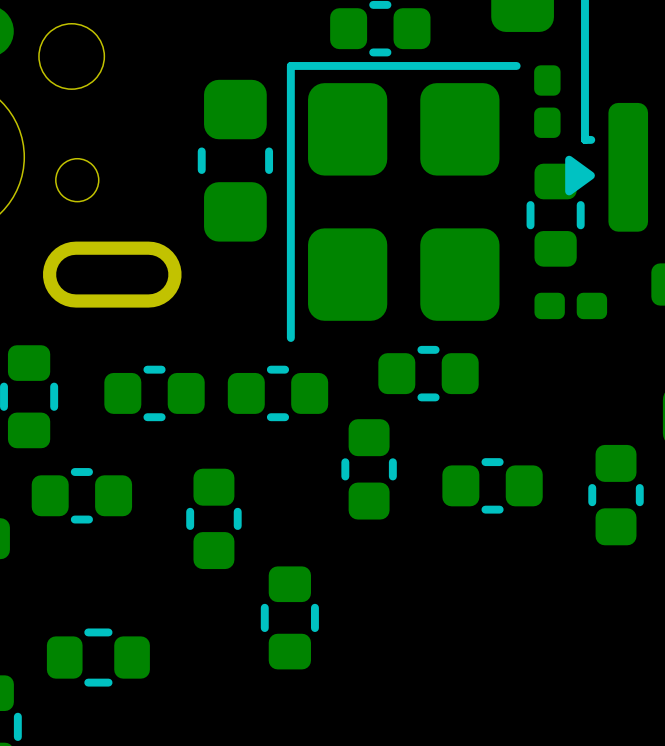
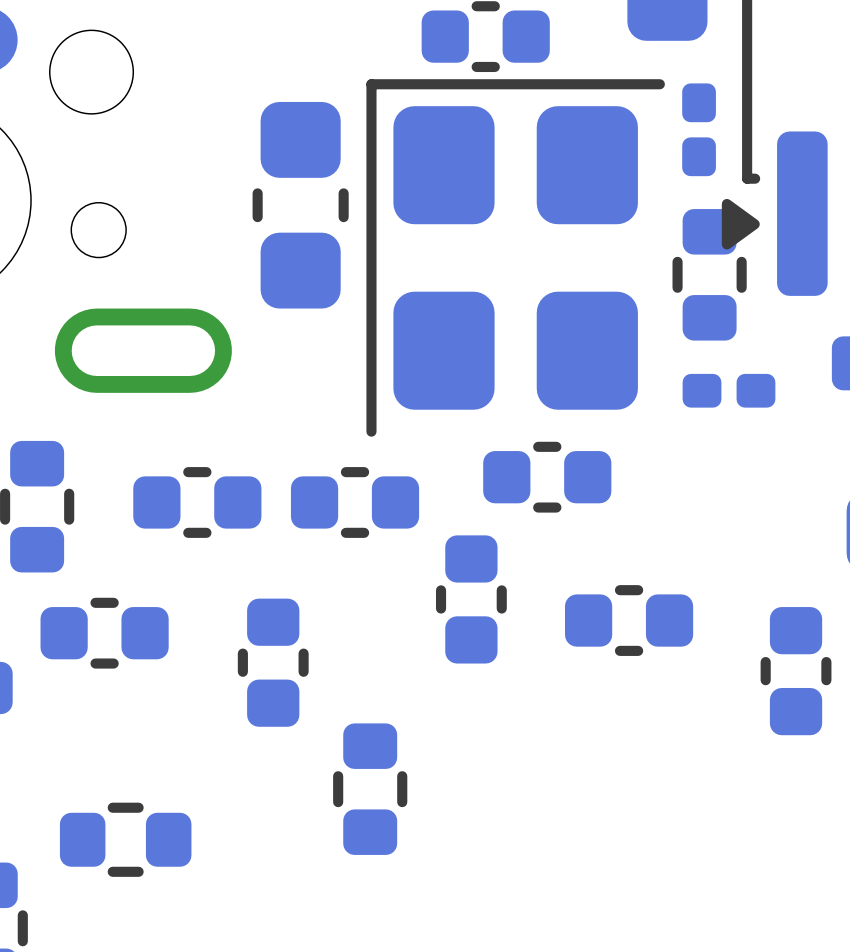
part position: (616, 495) -> (796, 671)

